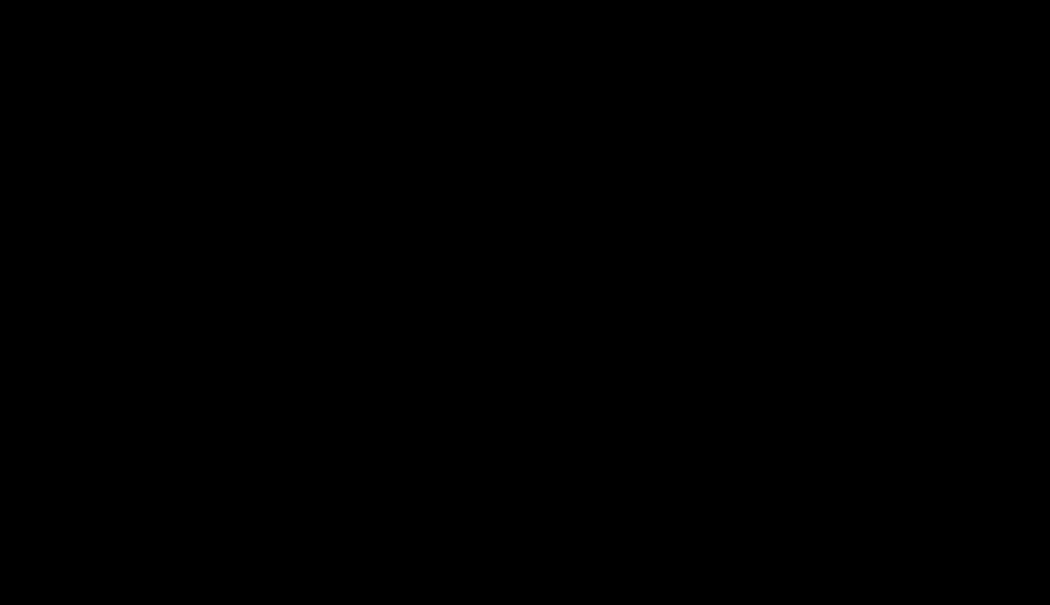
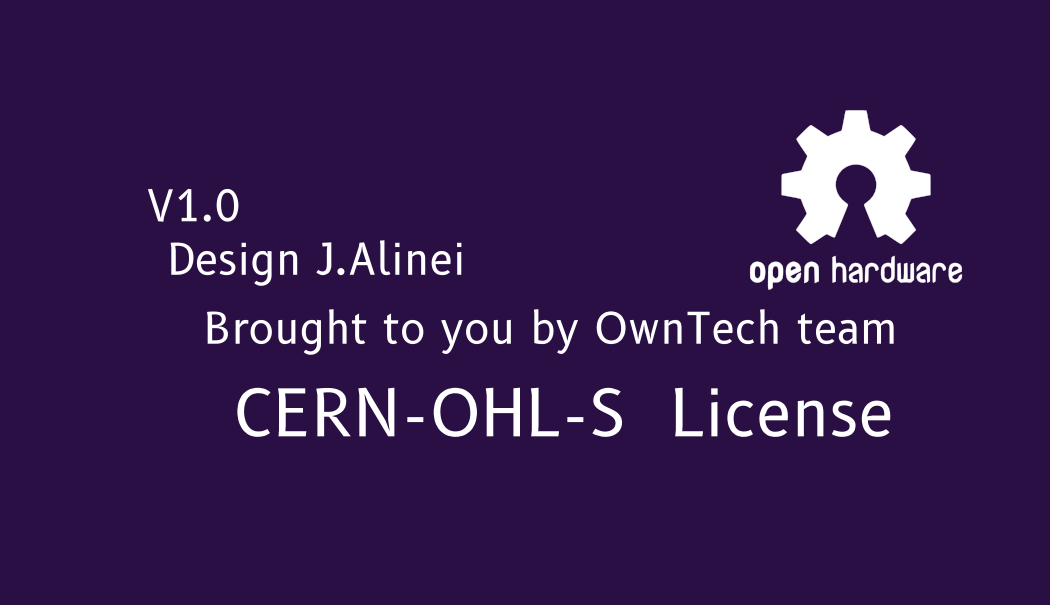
drawing: none -> [749, 110, 963, 290]
text: none -> V1.0 (193, 205)
text: none -> Design J.Alinei (316, 263)
text: none -> Brought to you by OwnTech team (550, 331)
text: none -> CERN-OHL-S License (563, 412)

